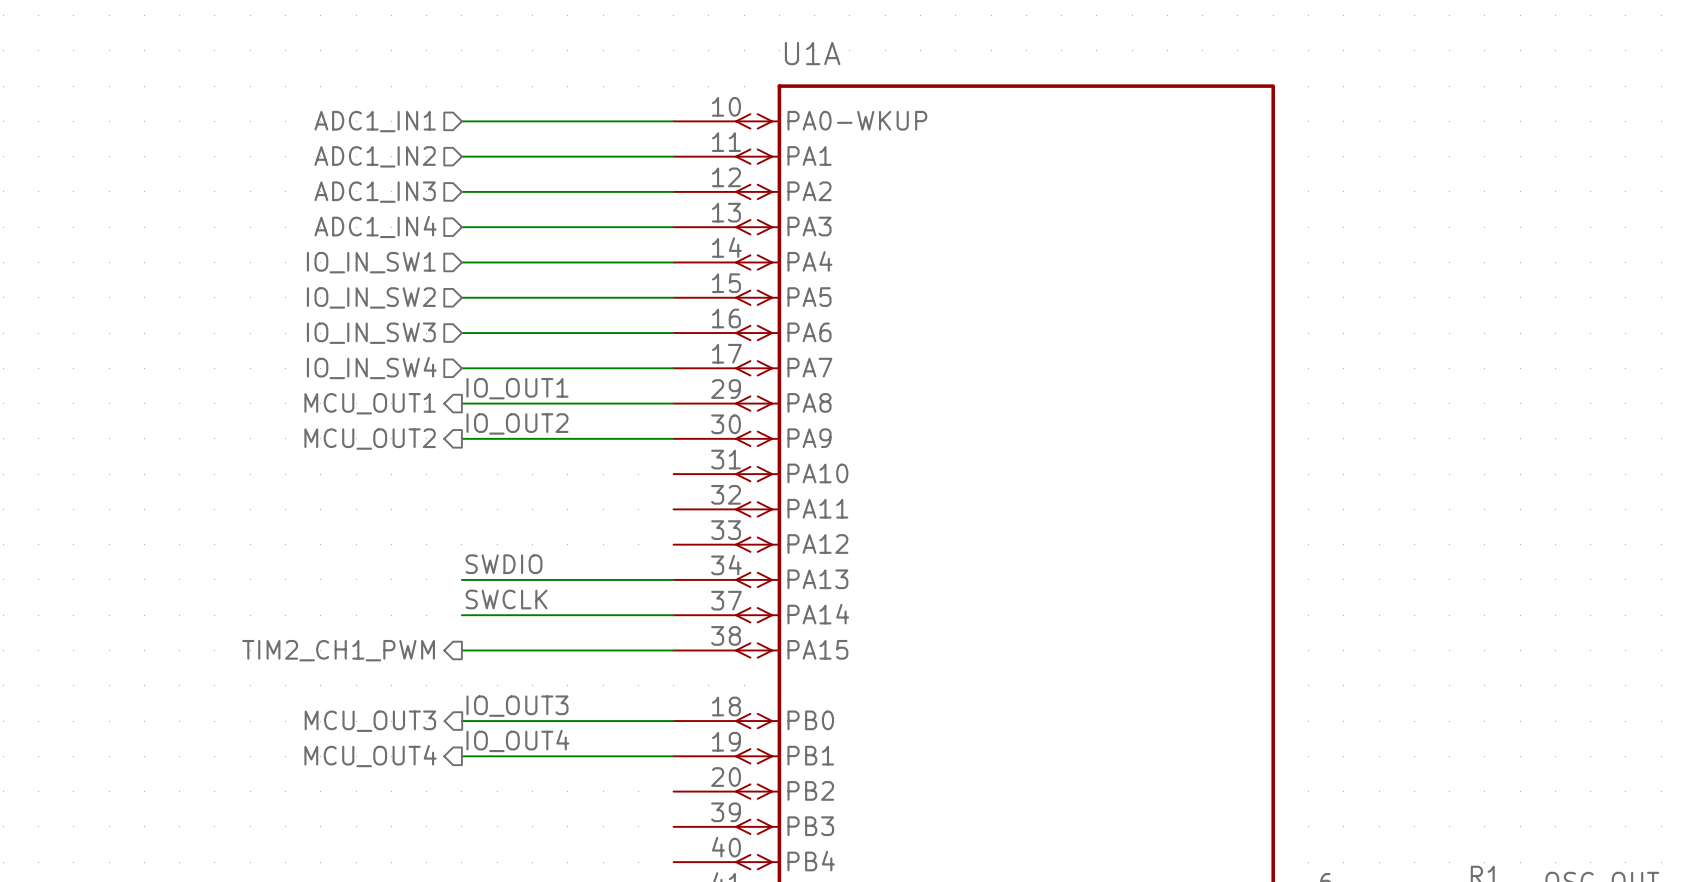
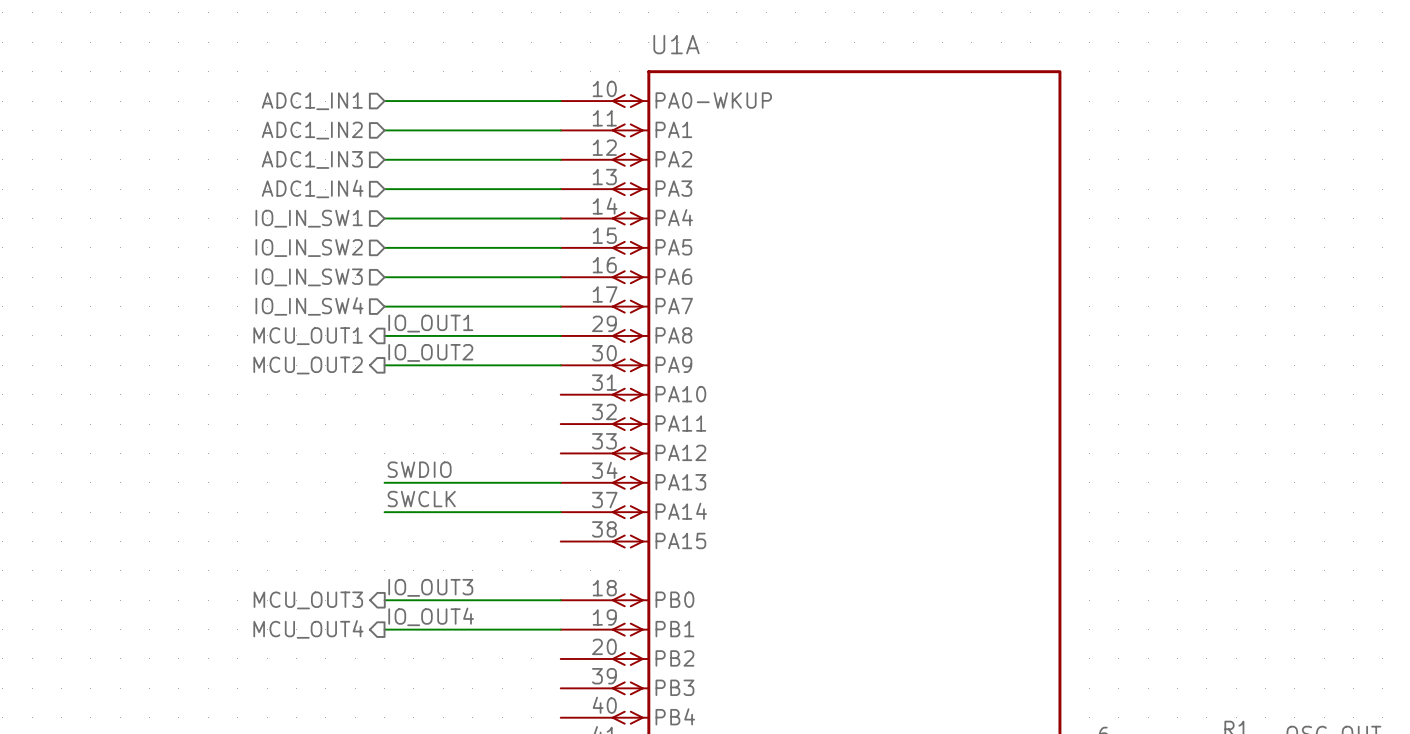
hierarchical label: TIM2_CH1_PWM (338, 650) -> none
wire: (461, 650) (673, 650) -> none

